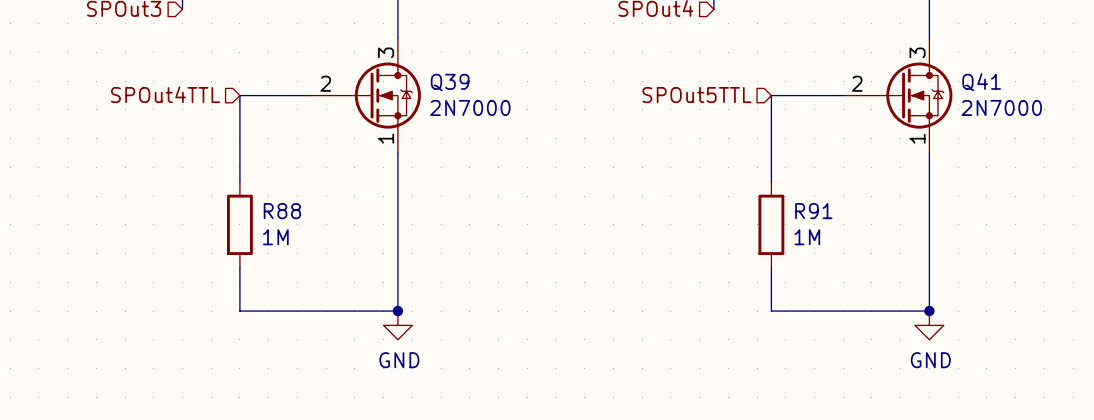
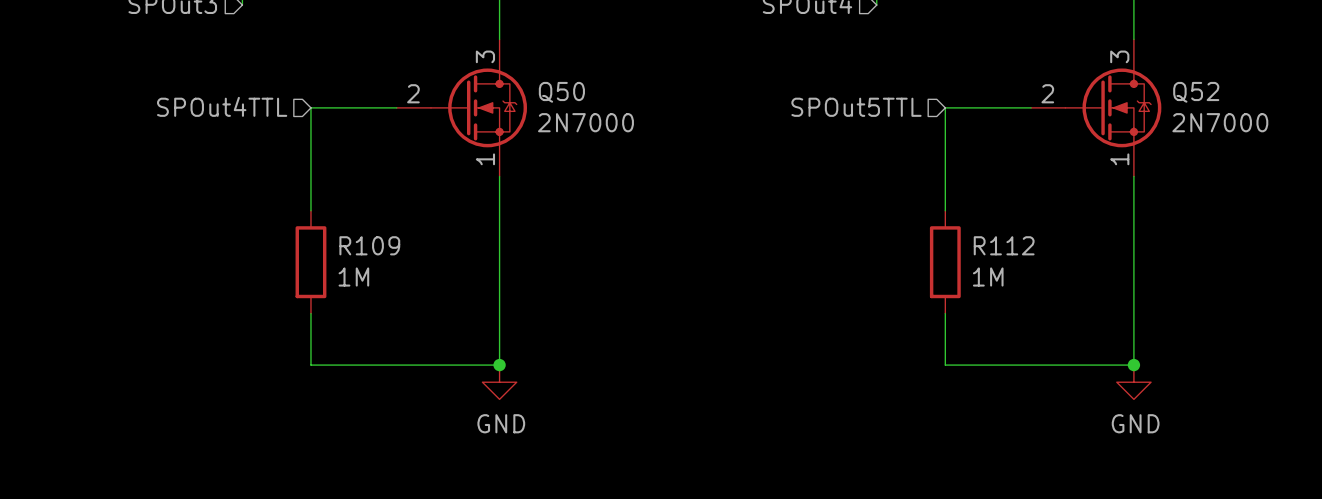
Q39 name: Q39 (450, 82) -> Q50 (561, 92)
Q41 name: Q41 (981, 82) -> Q52 (1196, 92)
R88 name: R88 (282, 211) -> R109 (369, 245)
R91 name: R91 (813, 211) -> R112 (1004, 245)

